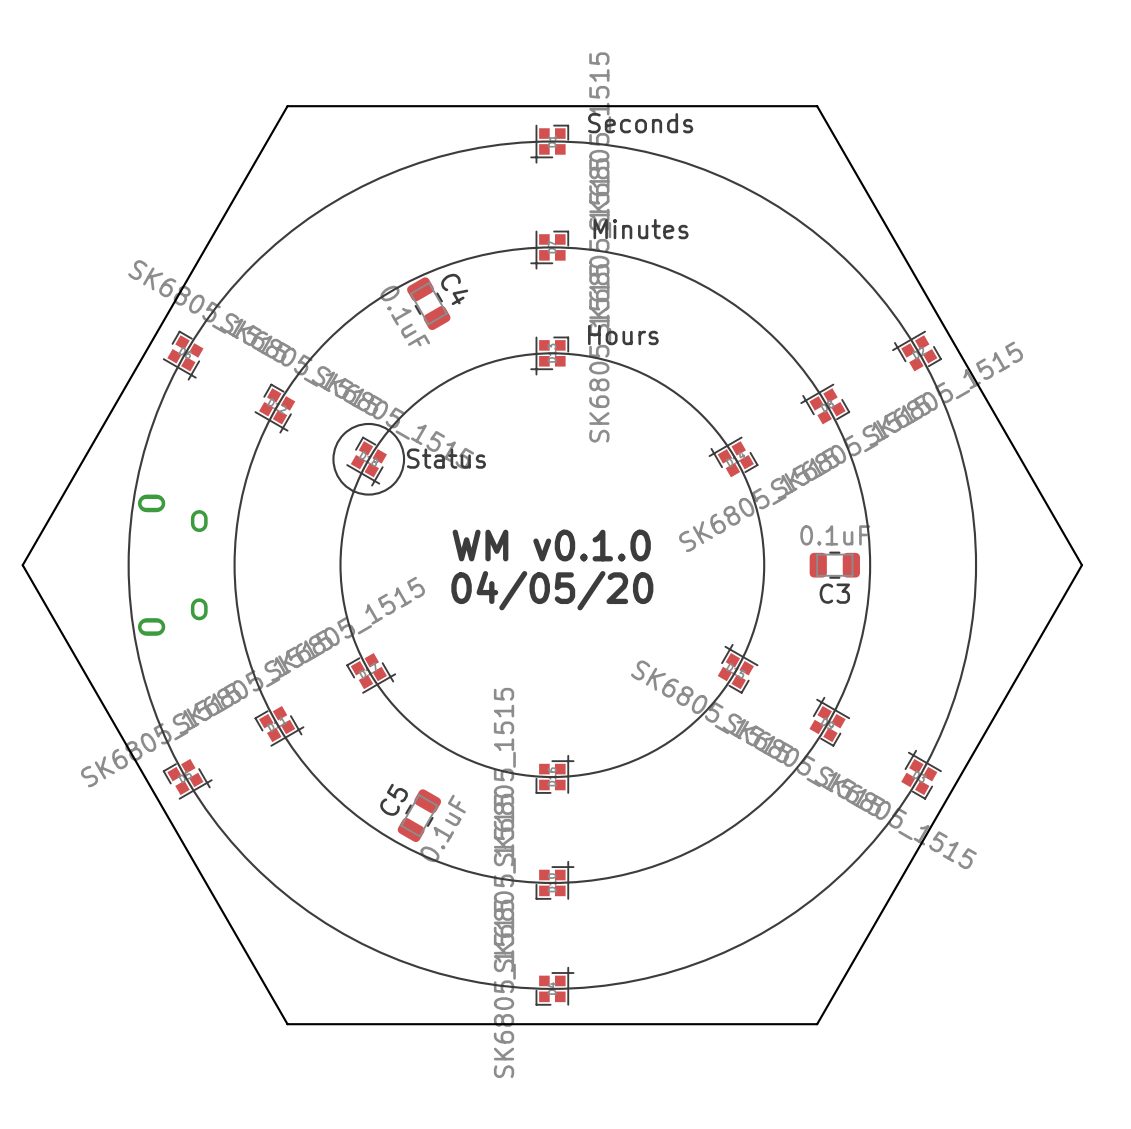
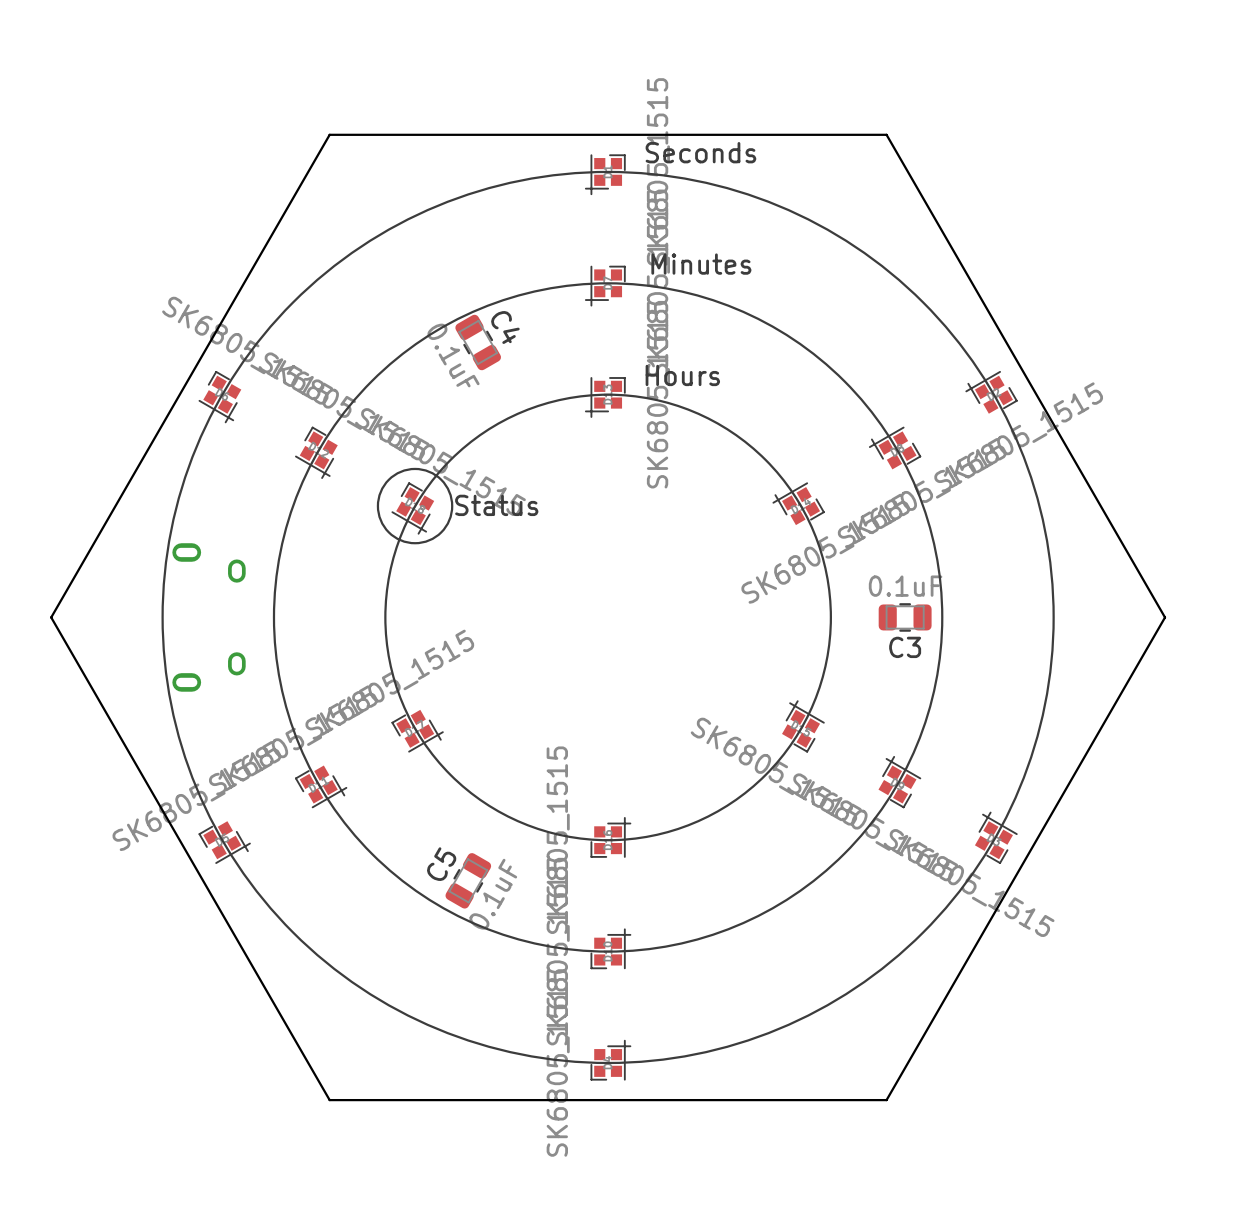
text: WM v0.1.0 (551, 545) -> none
text: 04/05/20 (552, 590) -> none

